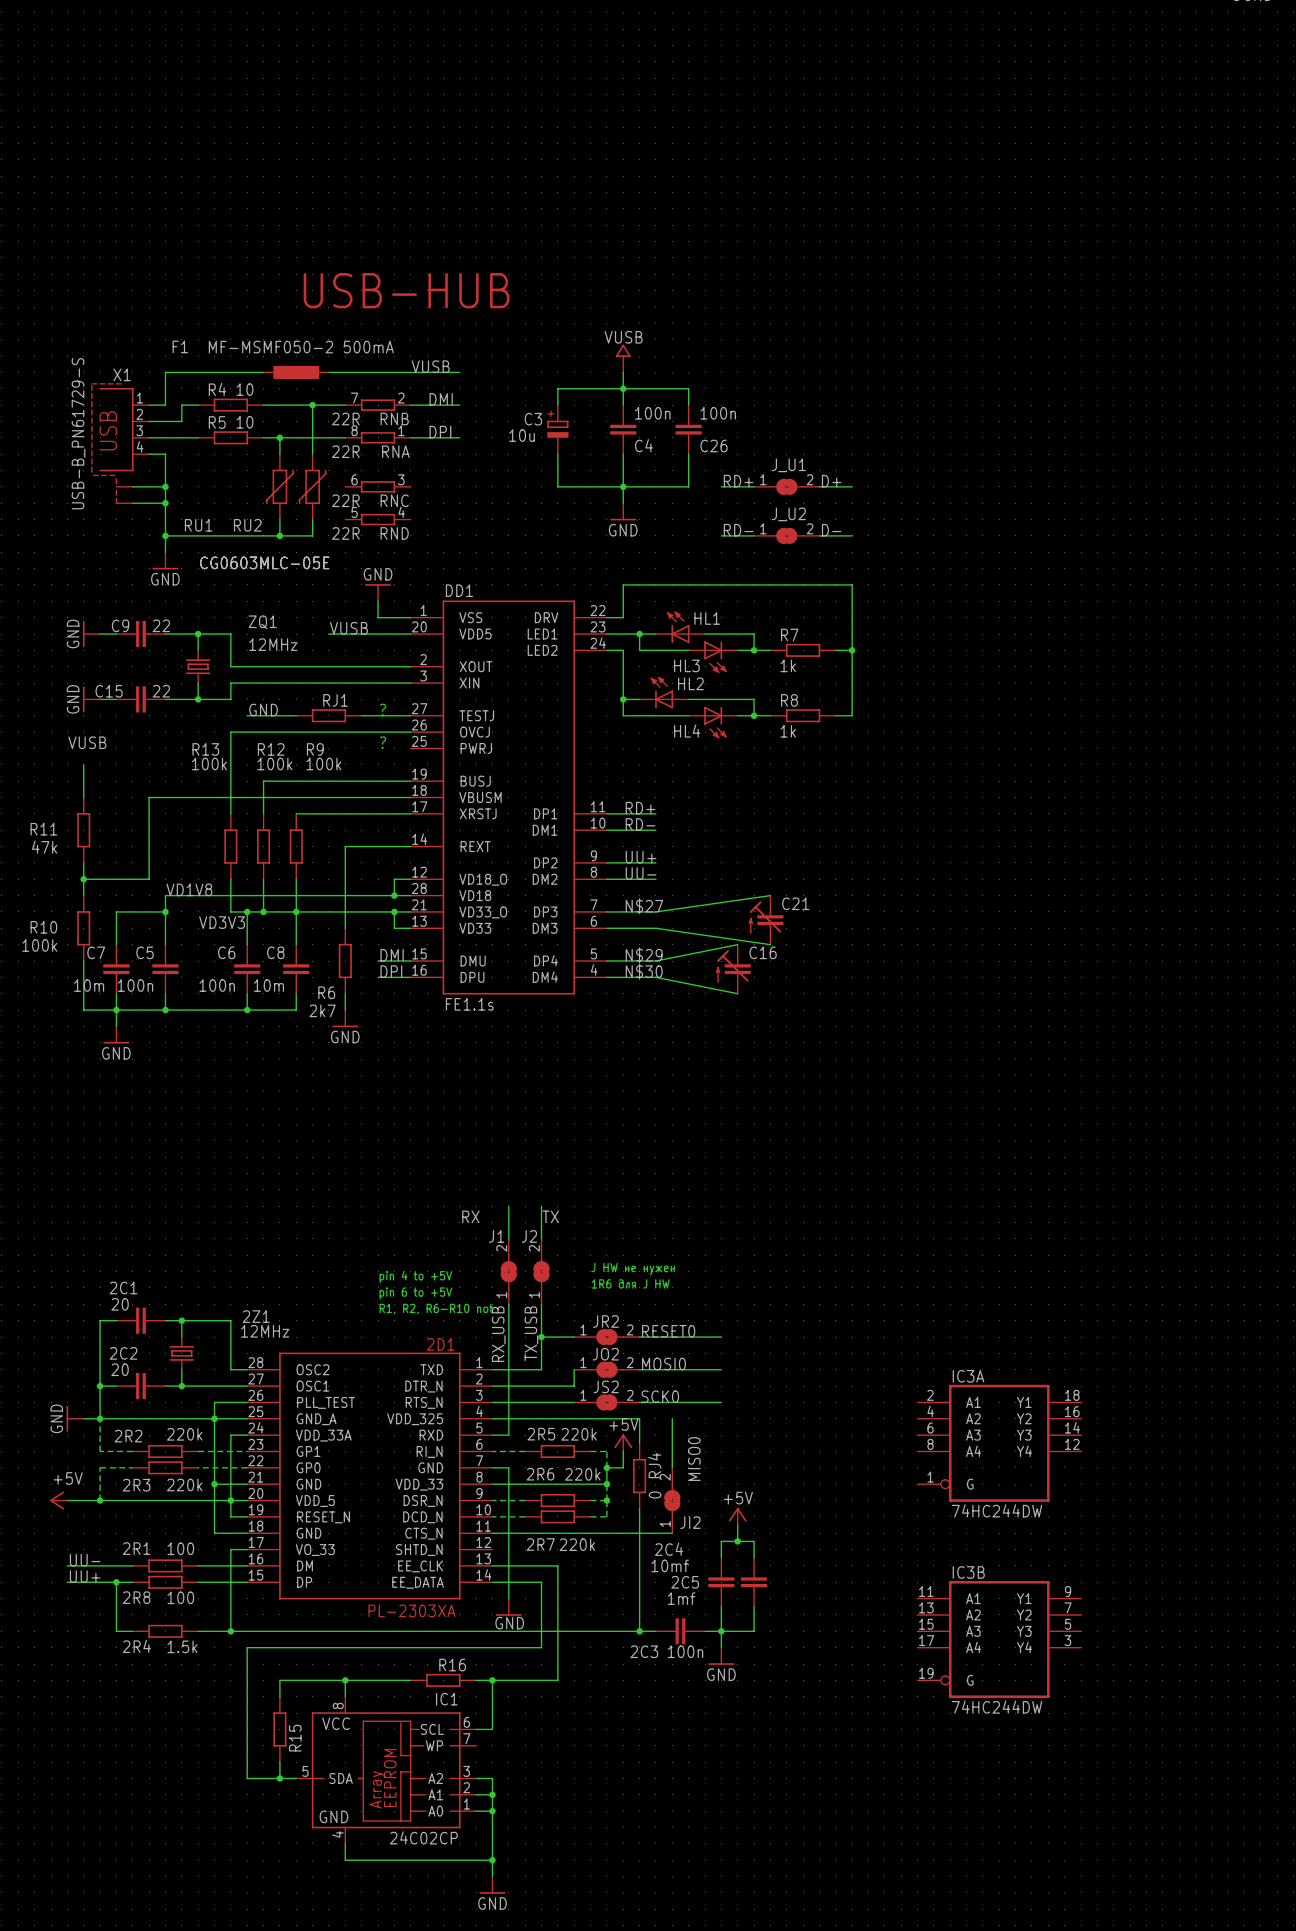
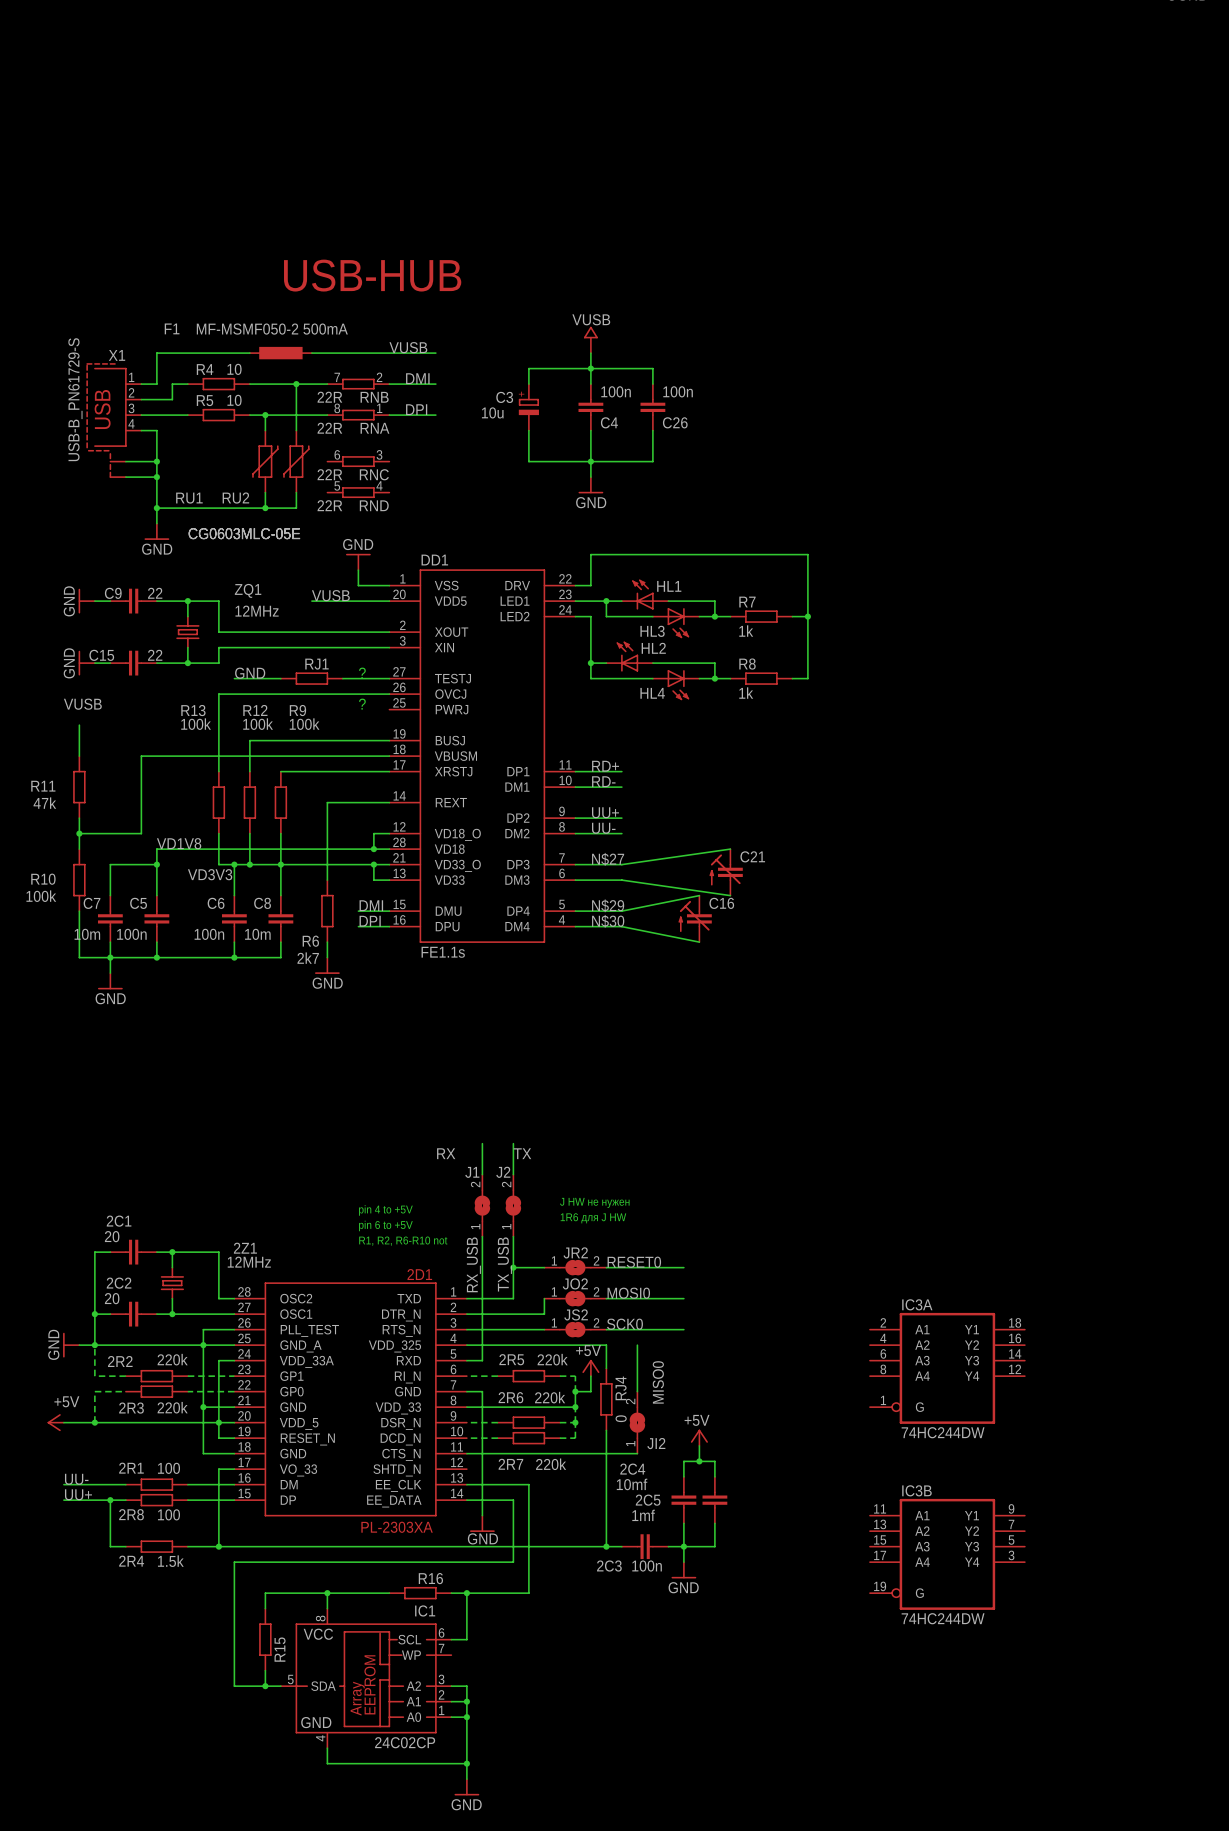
label: RD+ (738, 481) -> none
label: D+ (831, 481) -> none
wire: (721, 486) (754, 486) -> none
J_U1: (786, 486) -> none
wire: (819, 486) (852, 486) -> none
label: RD- (738, 530) -> none
label: D- (831, 530) -> none
wire: (721, 535) (754, 535) -> none
J_U2: (786, 535) -> none
wire: (819, 535) (852, 535) -> none

